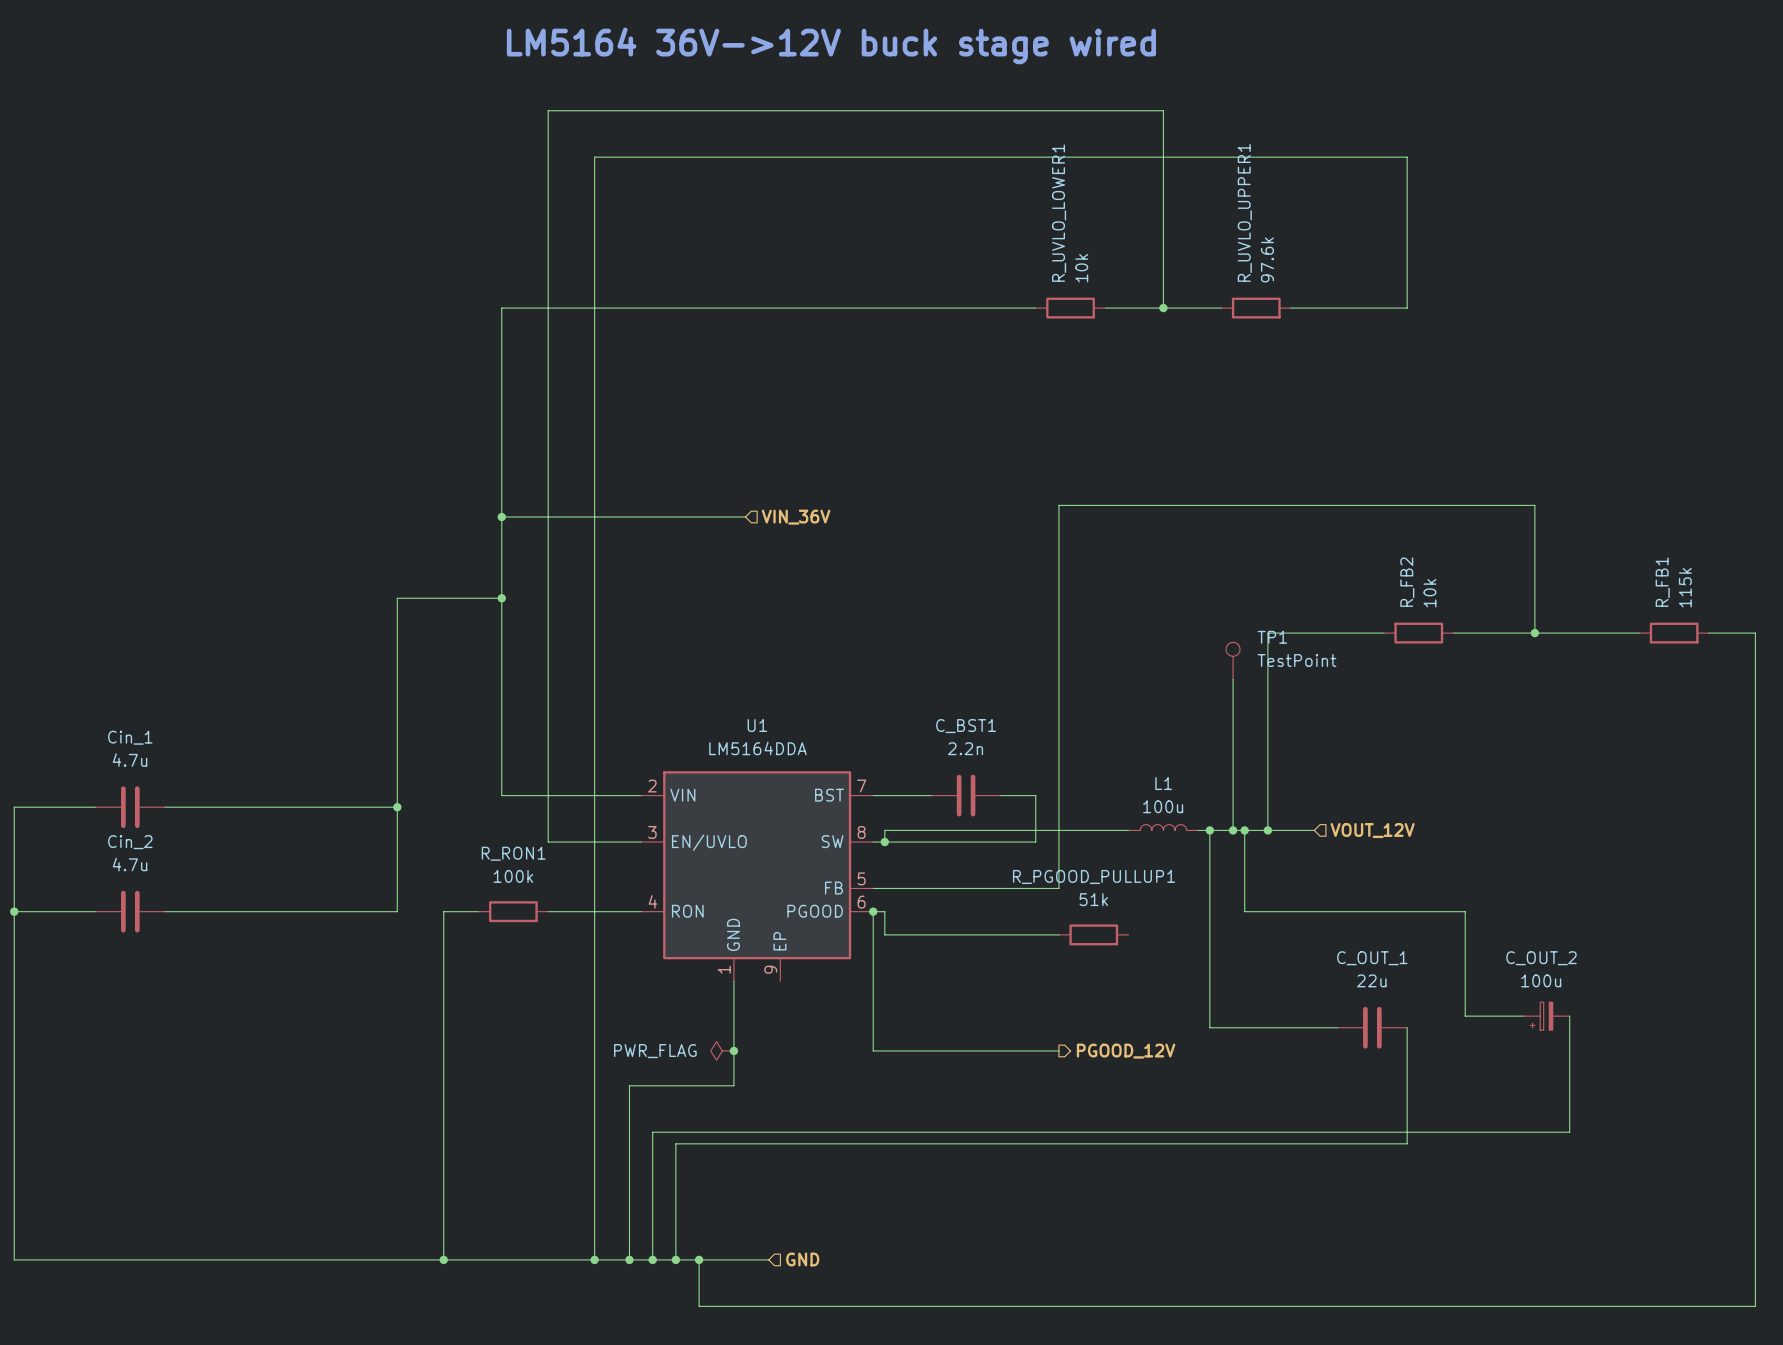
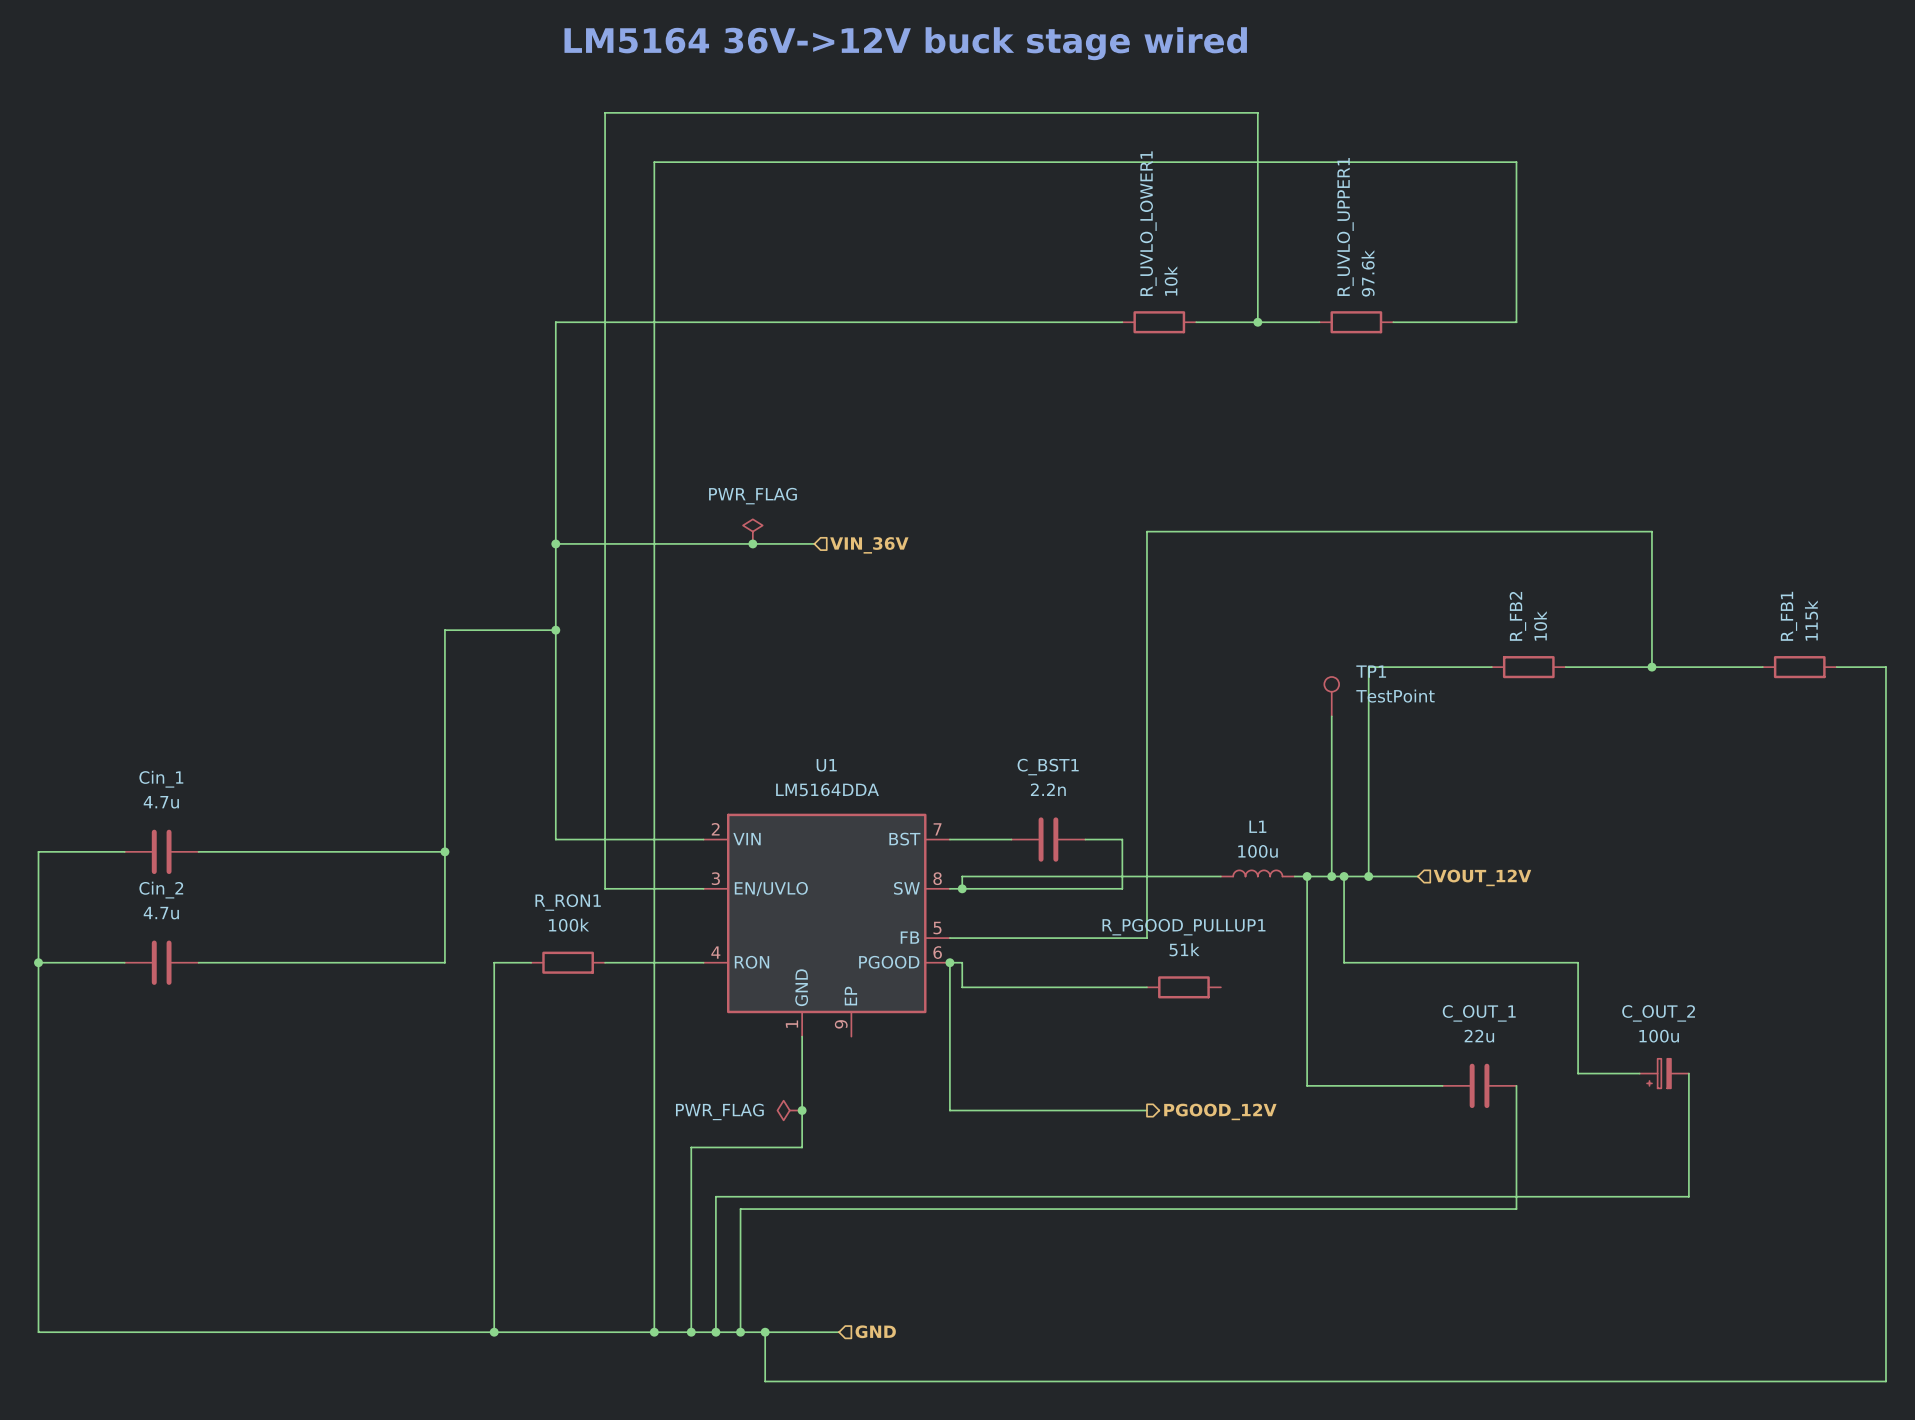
power symbol: none -> PWR_FLAG (752, 531)
junction: none -> (752, 543)

